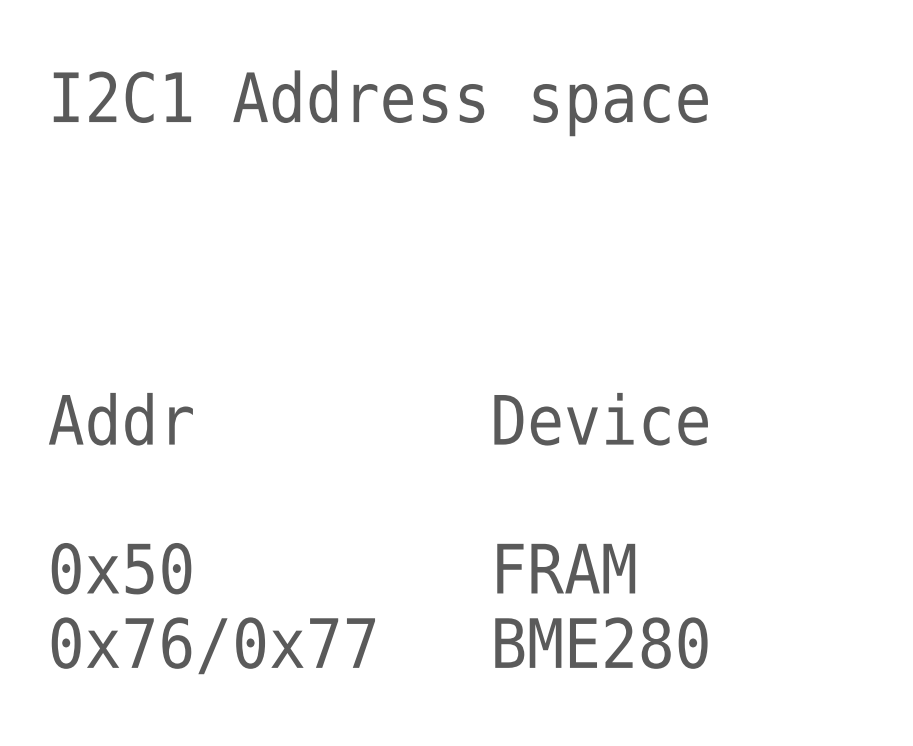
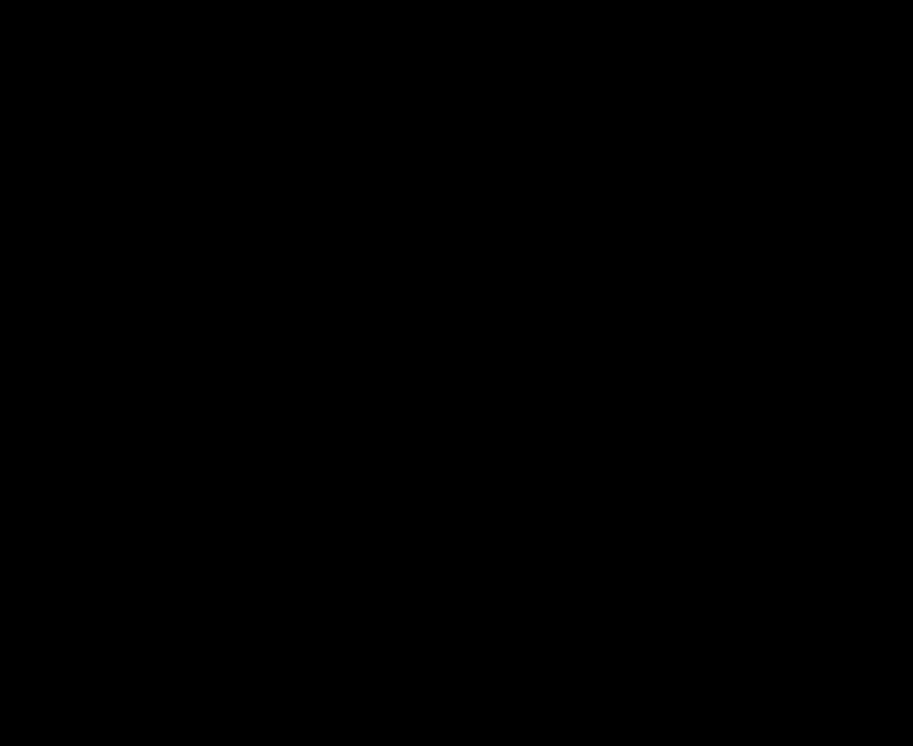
text: I2C1 Address space (380, 103) -> none
text: Addr Device (378, 419) -> none
text: 0x50 FRAM (343, 568) -> none
text: 0x76/0x77 BME280 (379, 645) -> none

